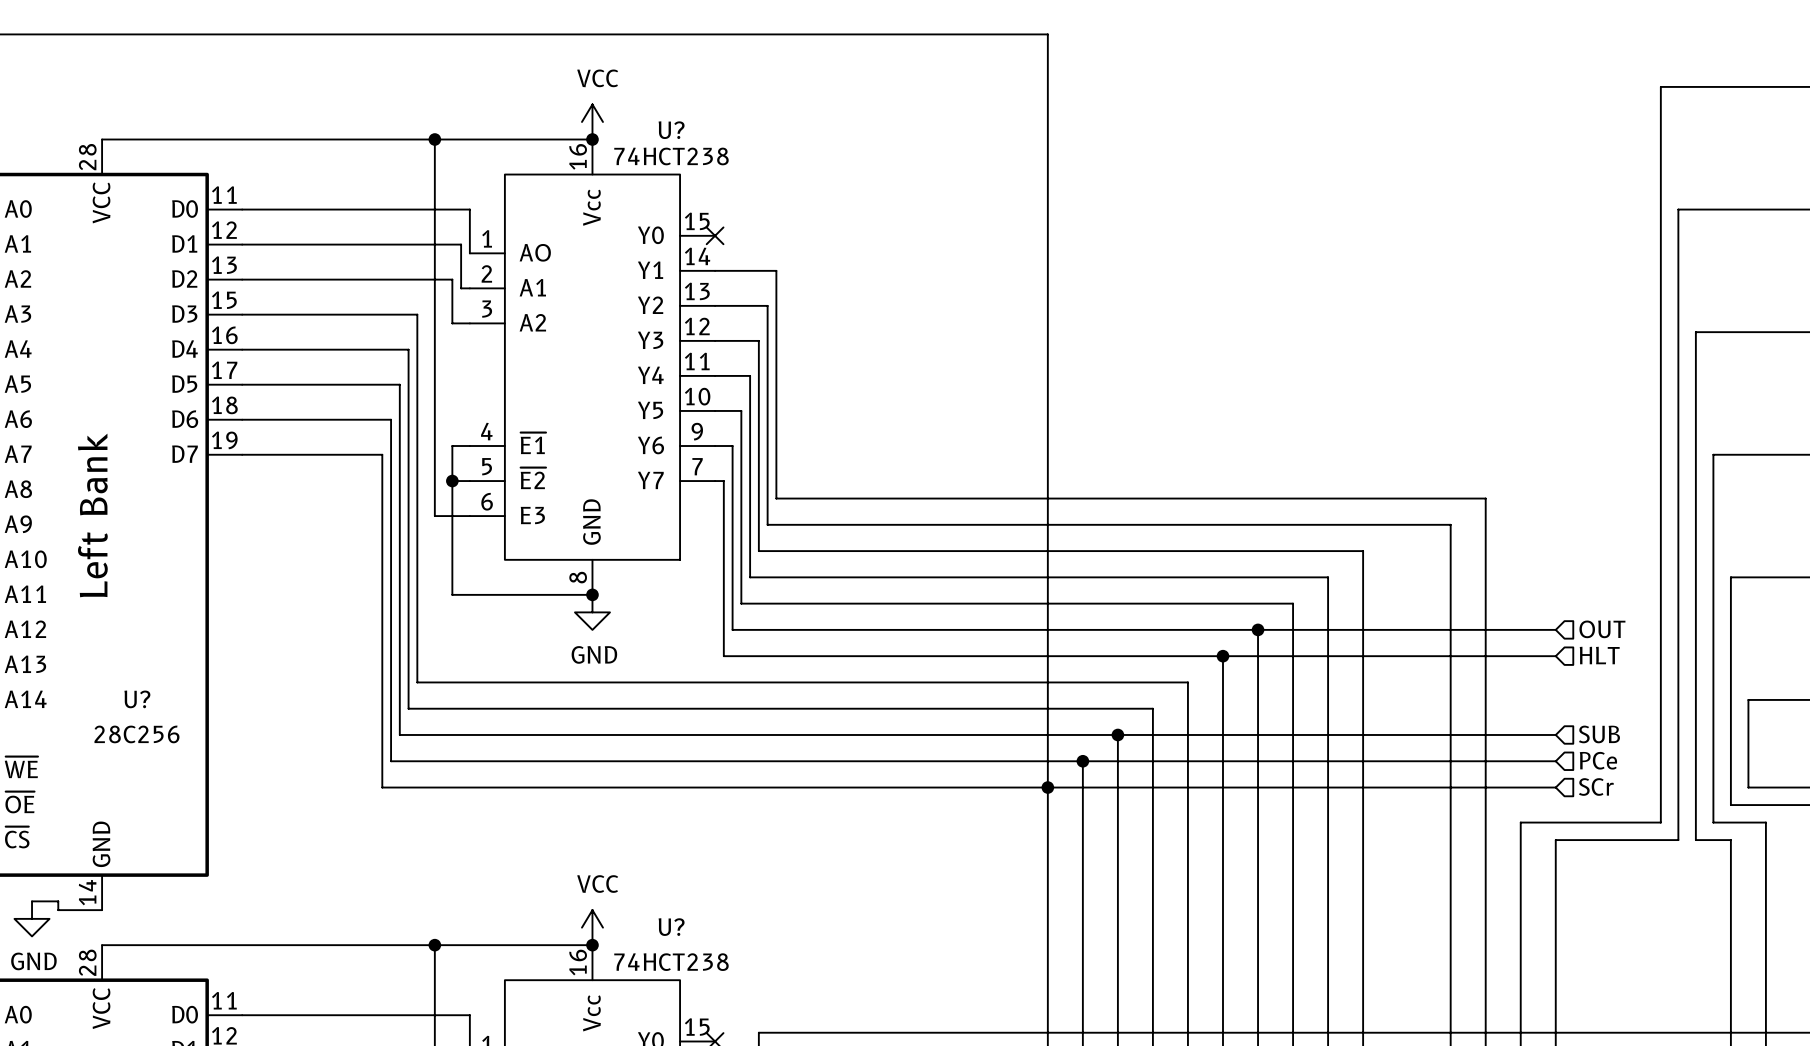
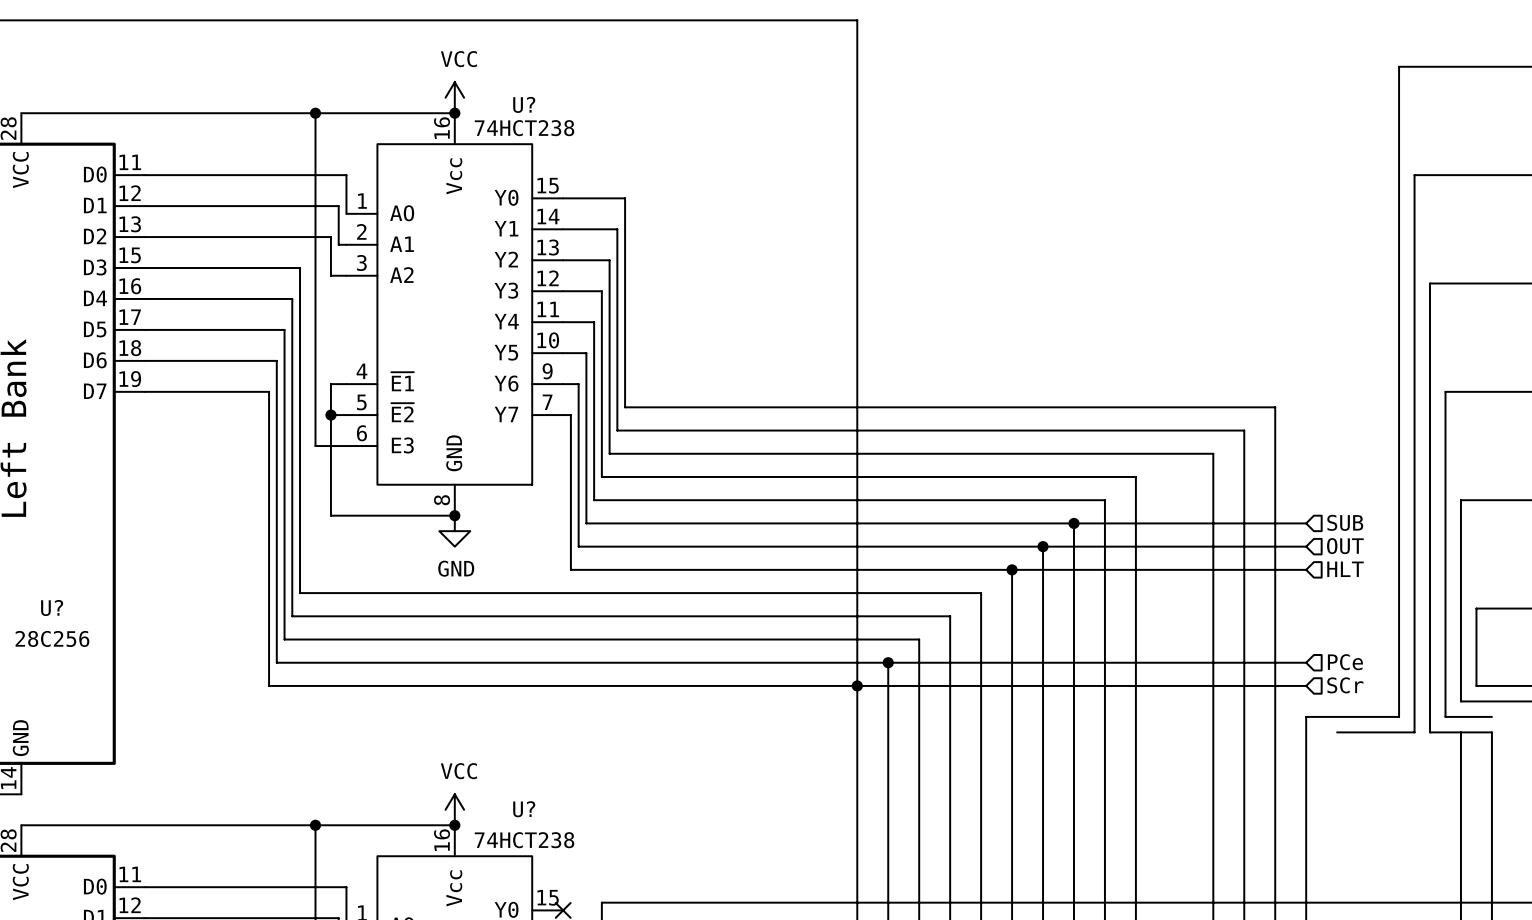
wire: none -> (563, 198) (625, 198) (625, 407) (1275, 407) (1275, 716)
no-connect mark: (715, 235) -> none
wire: none -> (1073, 523) (1306, 523)
junction: none -> (1073, 523)
wire: (1117, 734) (1555, 734) -> none
junction: (1117, 734) -> none
hierarchical label position: SUB (1599, 734) -> SUB (1345, 522)
wire: (1520, 822) (1555, 822) -> (1306, 732) (1306, 716)
wire: (1765, 822) (1765, 840) -> (1460, 732) (1491, 732)
wire: (1555, 840) (1590, 840) -> none

